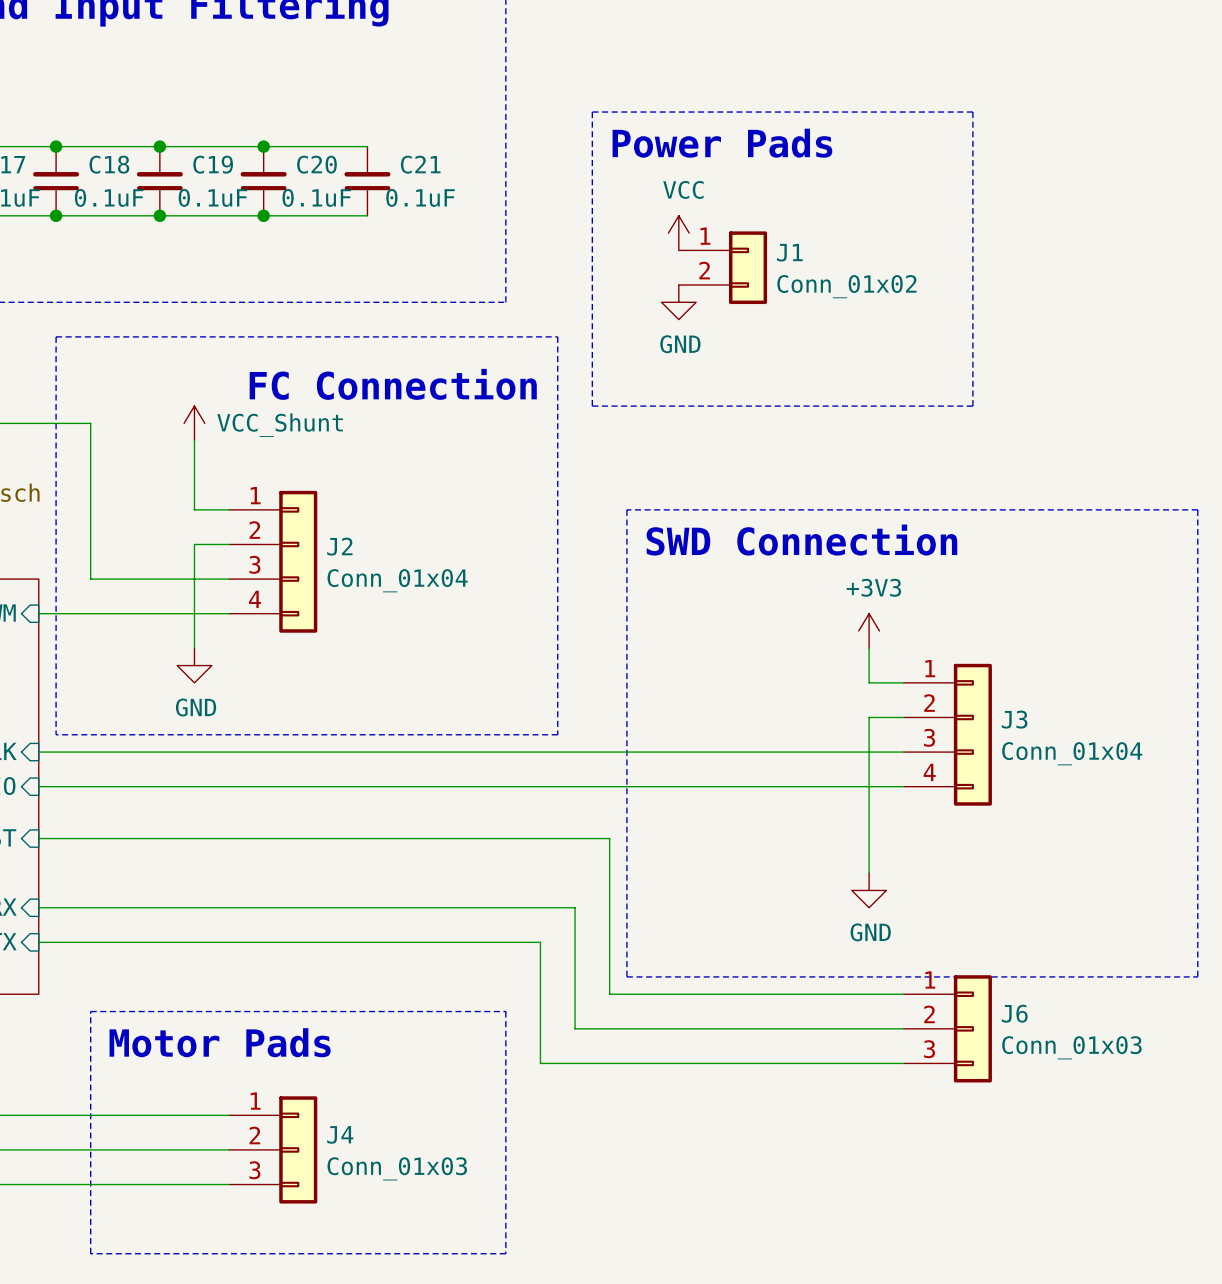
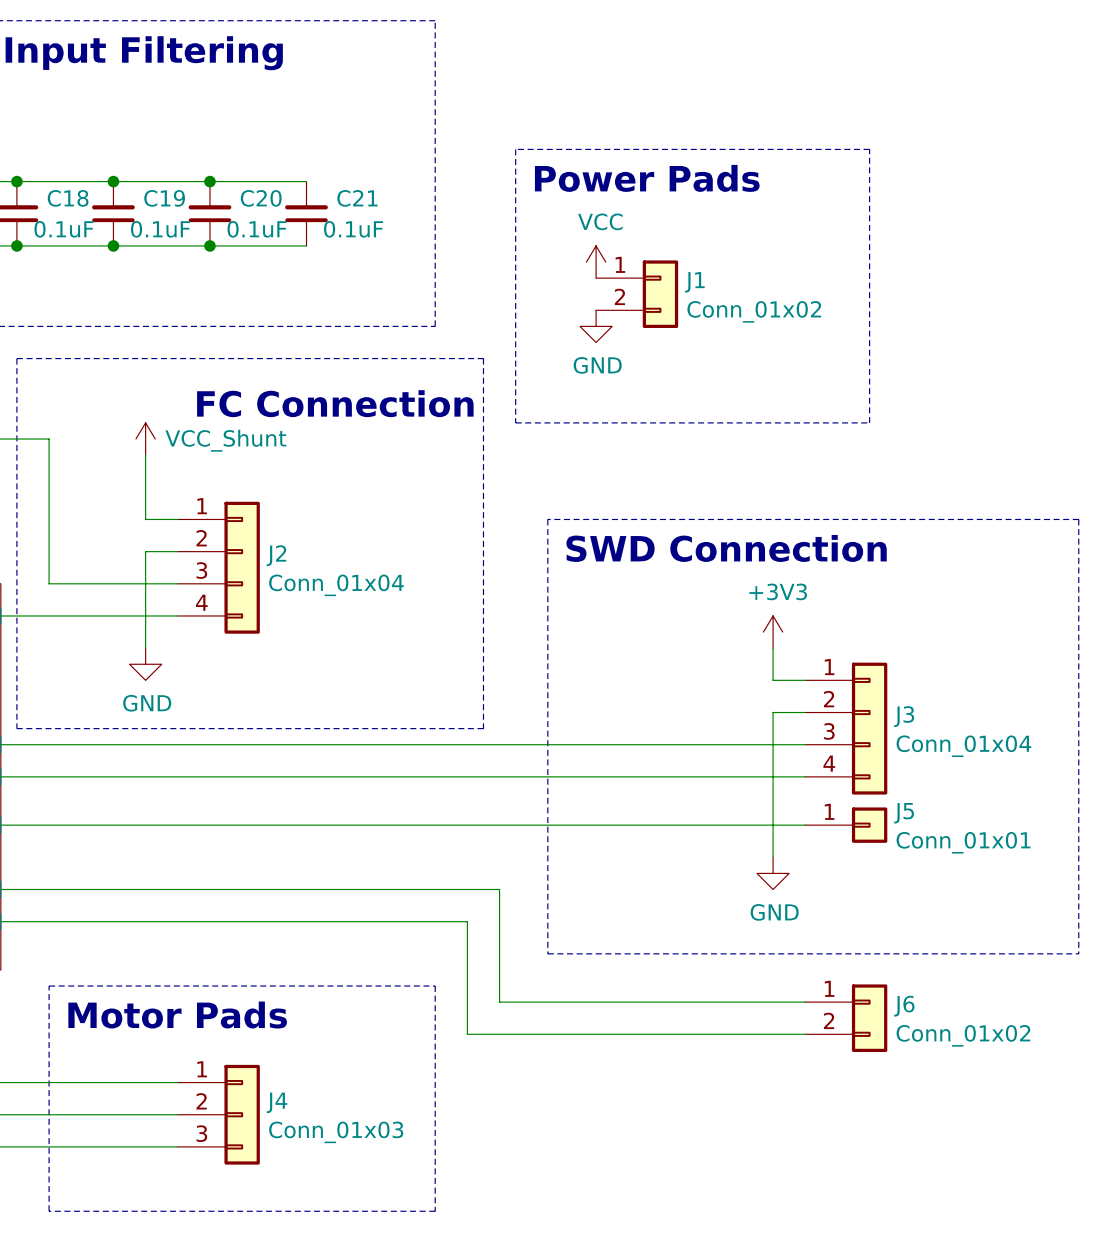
wire: (609, 838) (609, 994) (903, 994) -> (531, 825) (805, 825)
J5: none -> Conn_01x01 (846, 825)
J6 symbol: [903, 975, 992, 1083] -> [805, 984, 888, 1052]
J6 value: Conn_01x03 (1071, 1047) -> Conn_01x02 (963, 1035)

